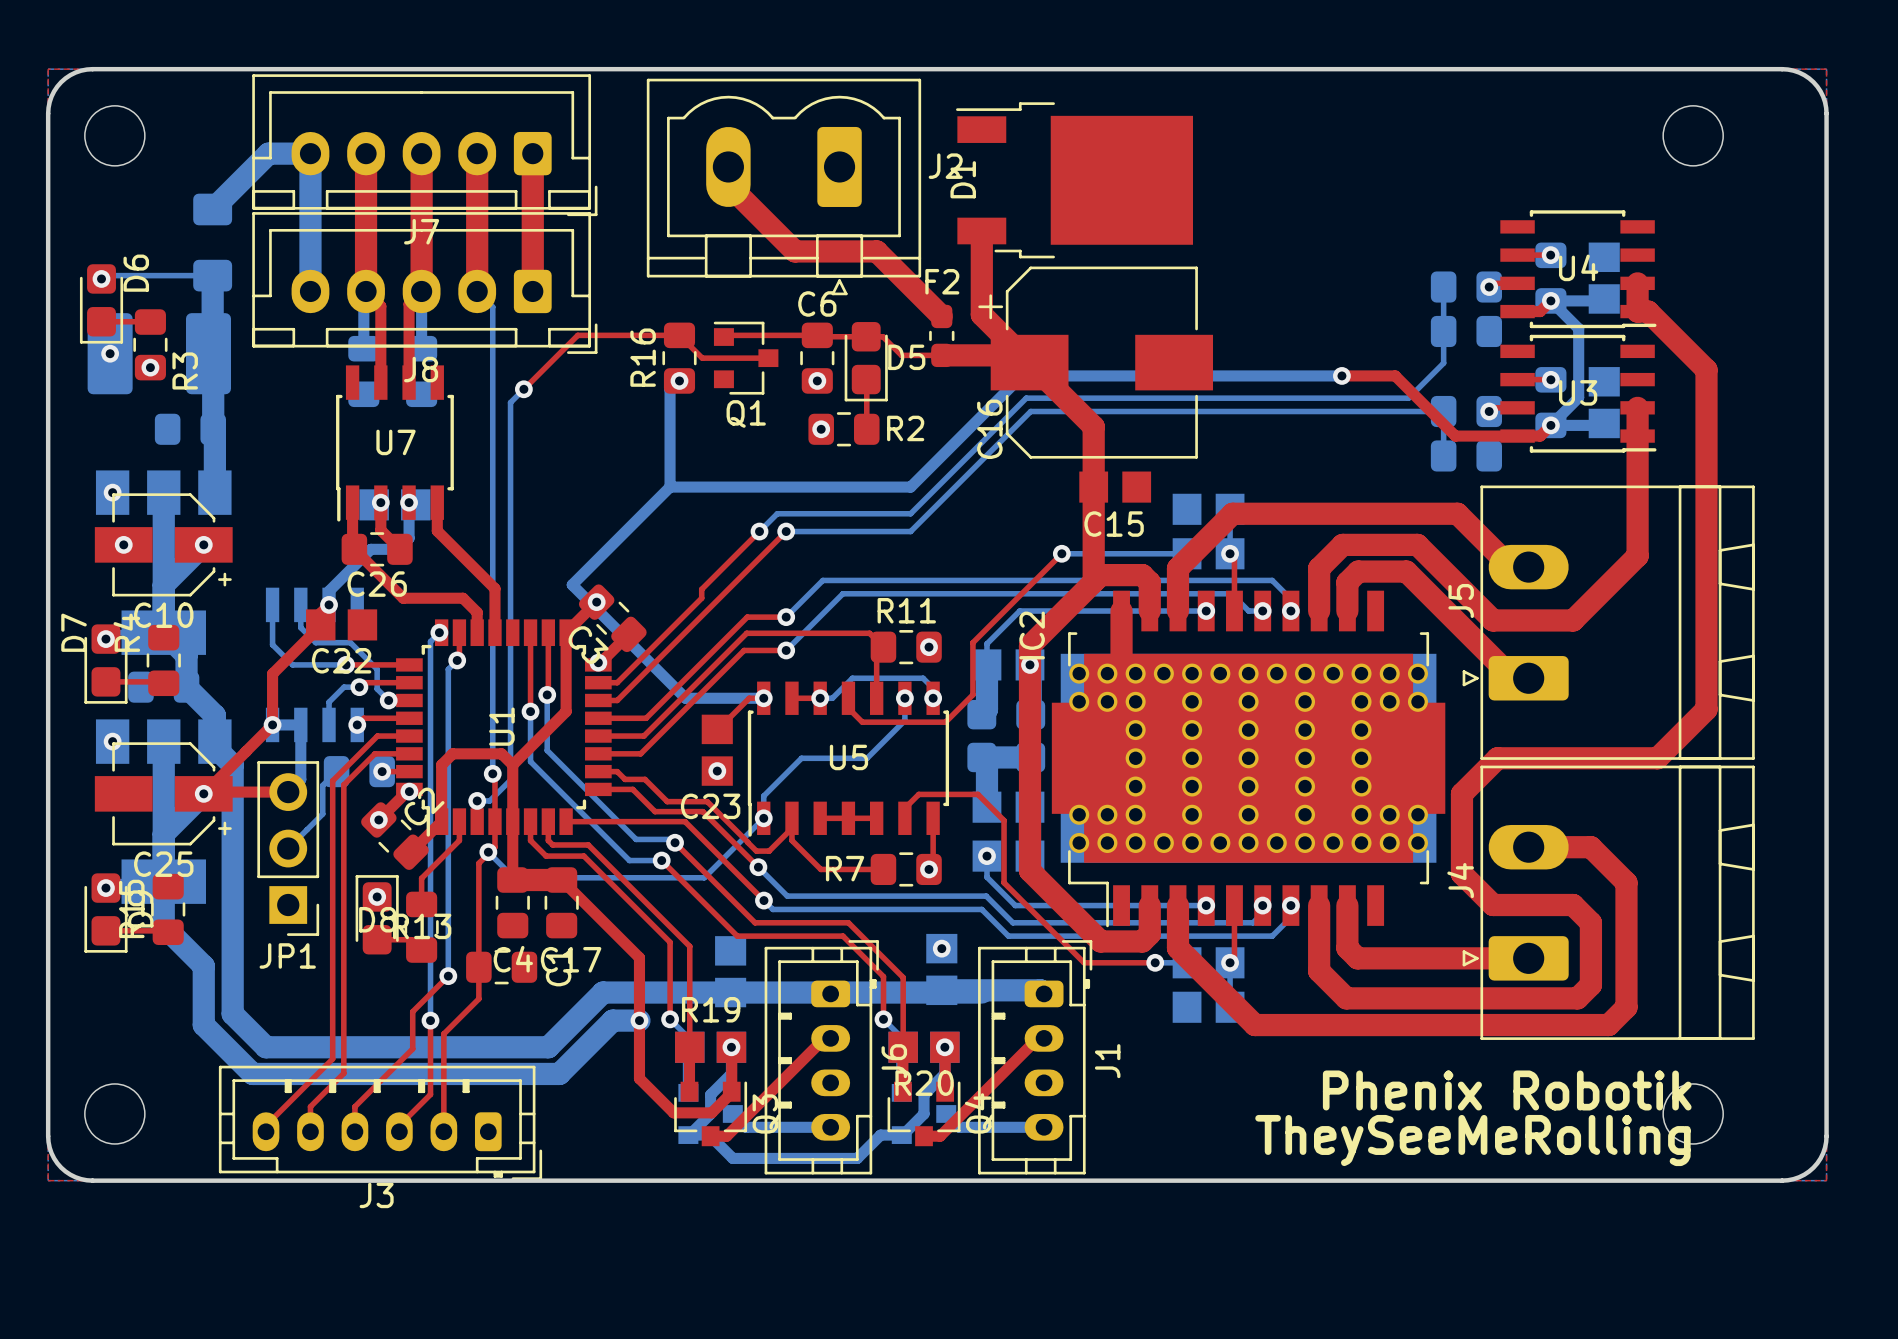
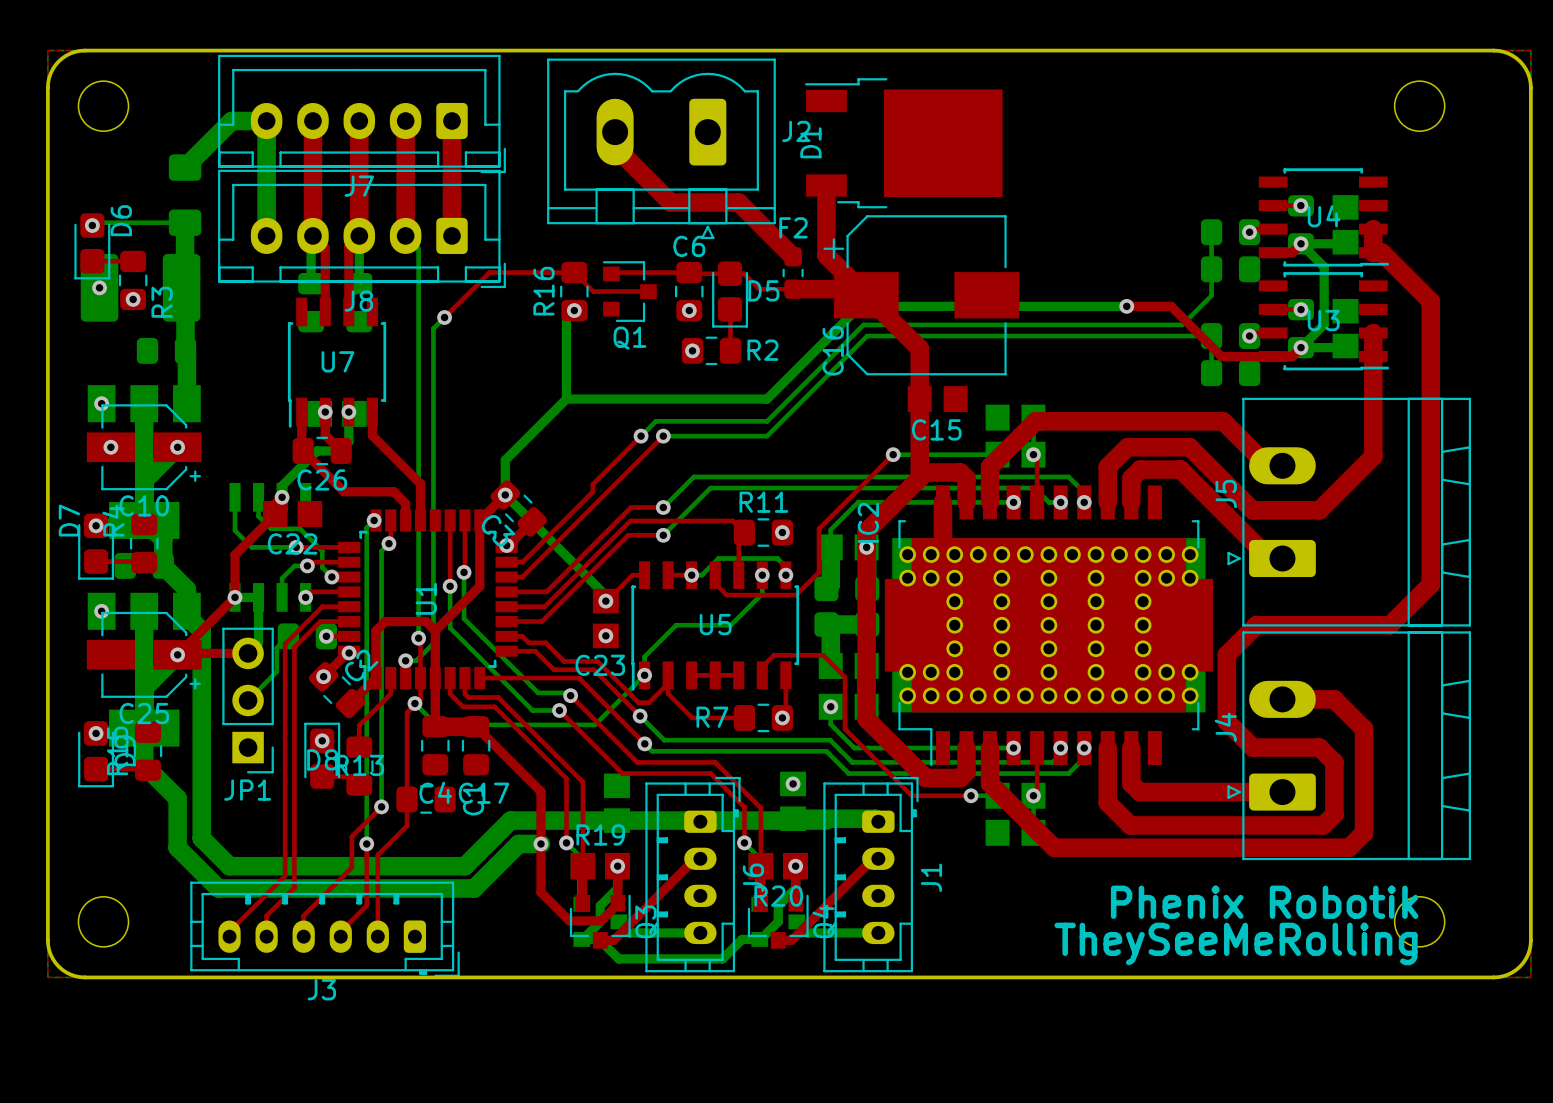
bottom track: (596, 560) (572, 584) (685, 698) (763, 698) -> (505, 460) (505, 495) (605, 595) (605, 601)
via position: (763, 698) -> (605, 601)

